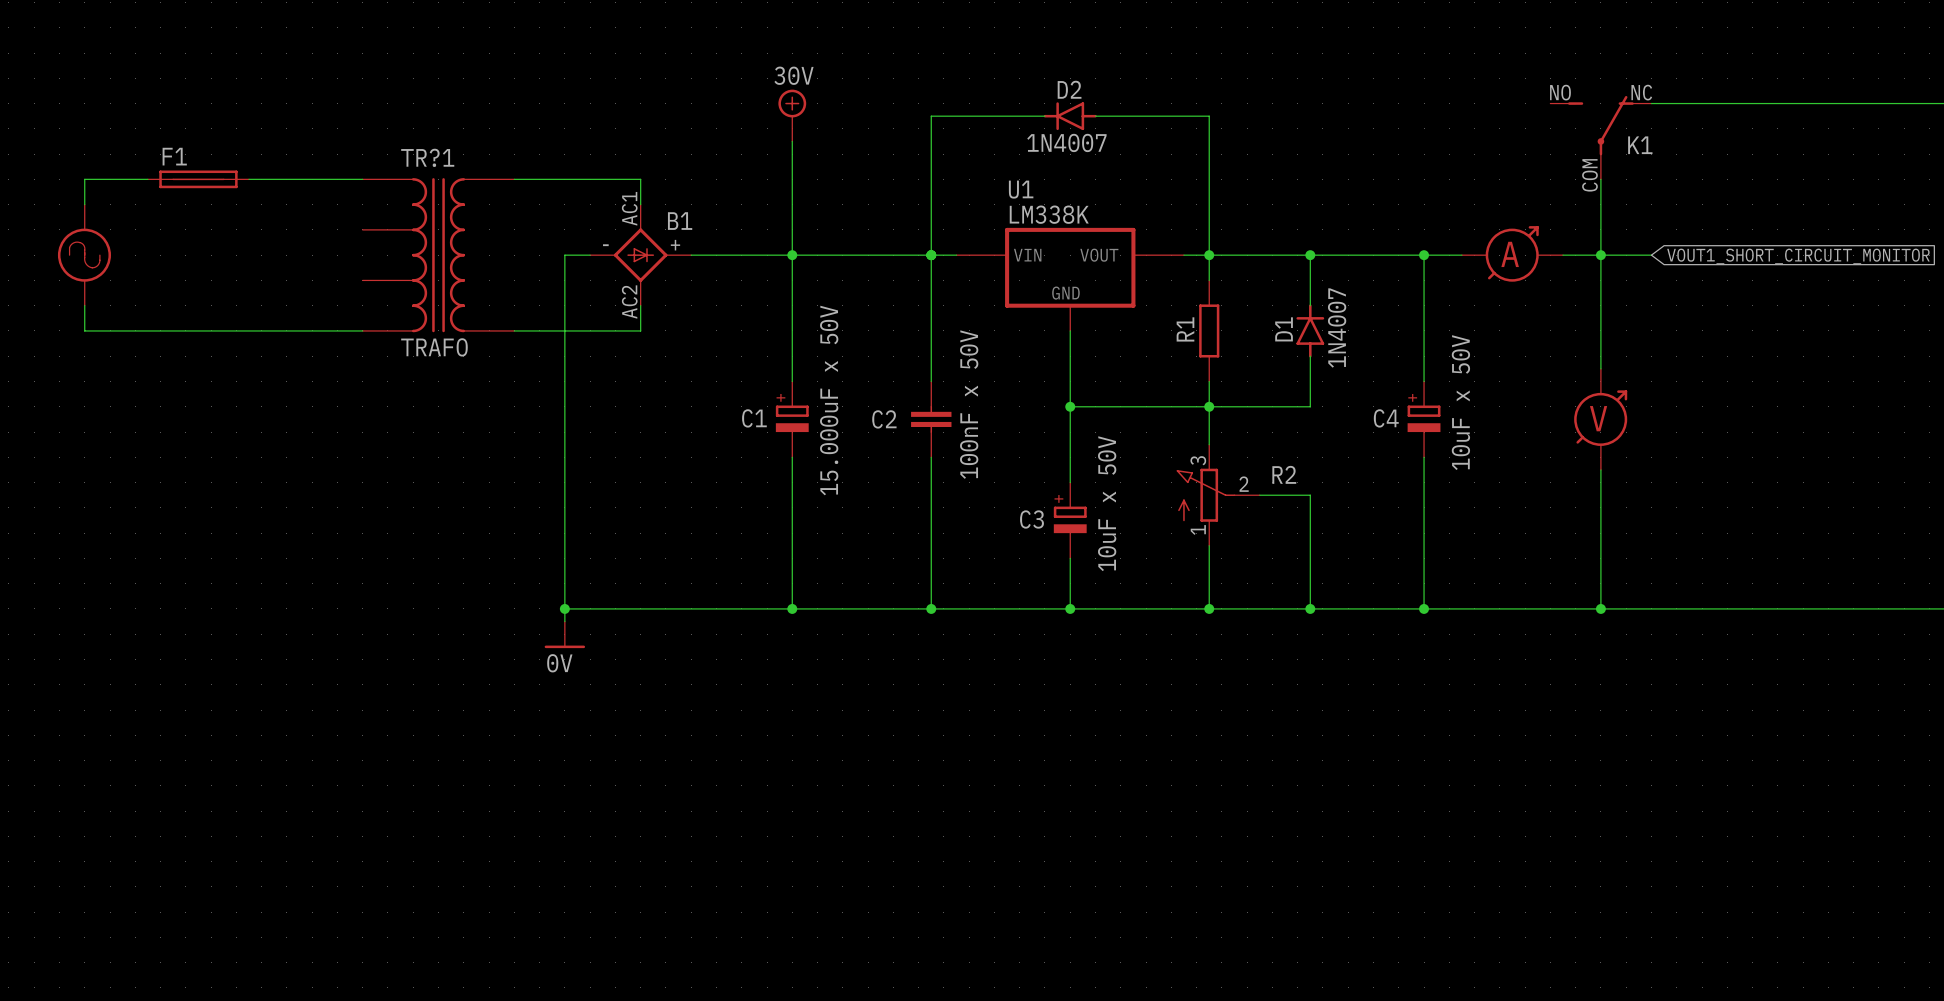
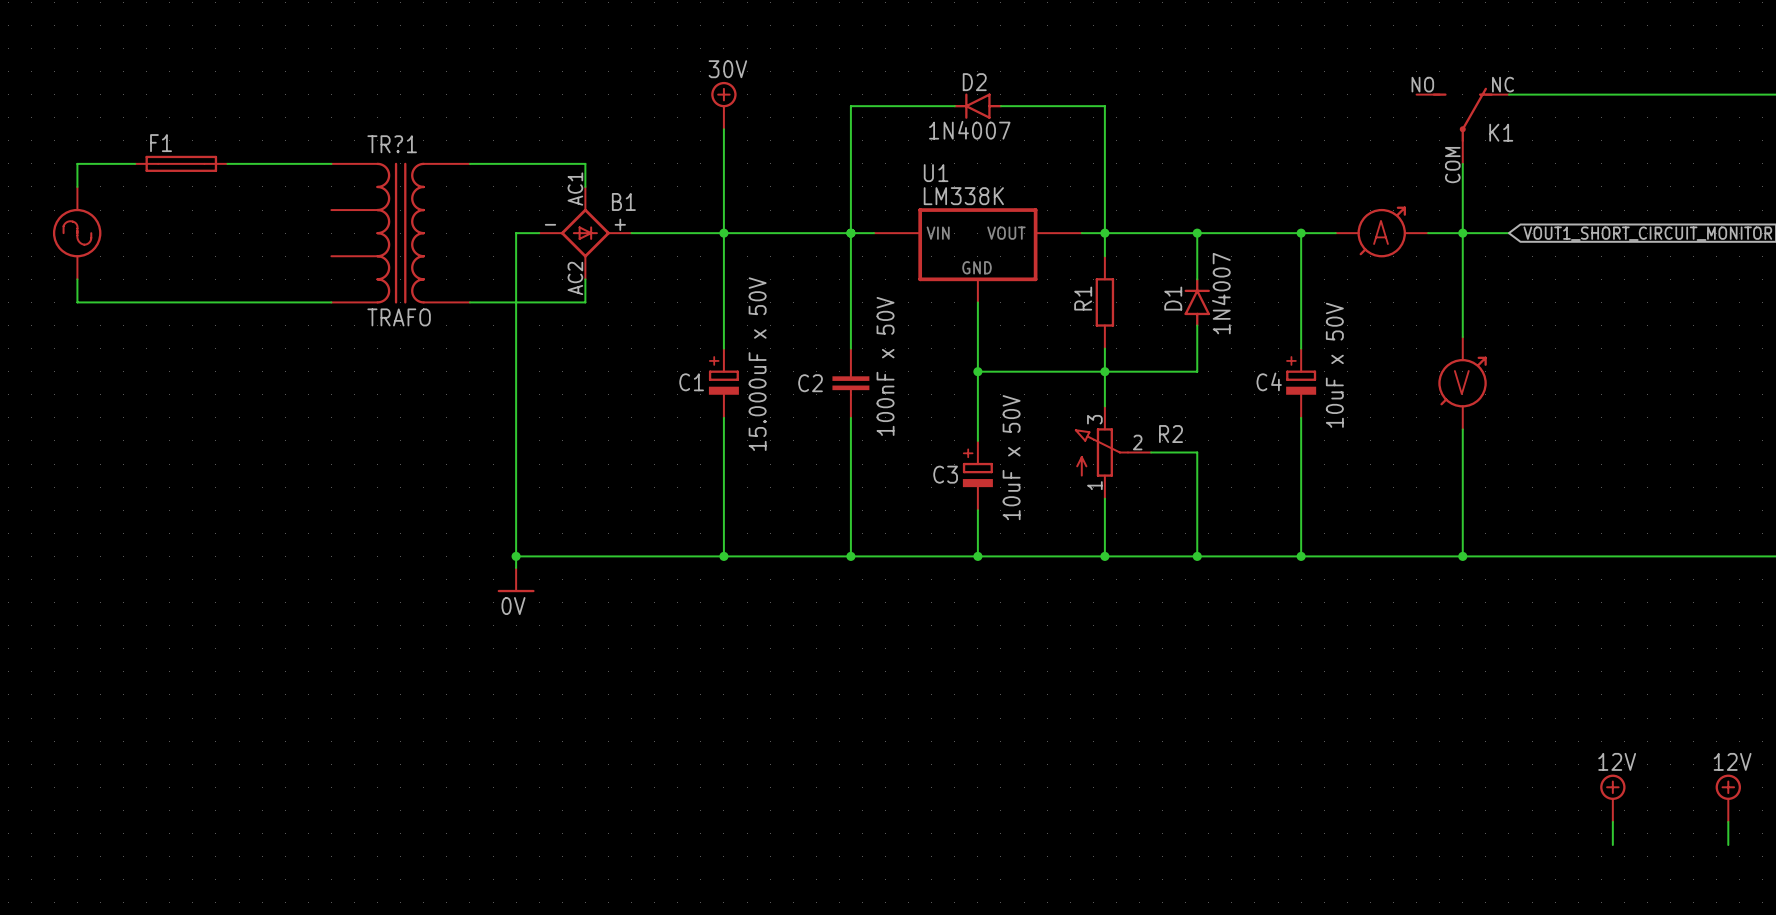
power symbol: none -> 12V (1612, 798)
power symbol: none -> 12V (1728, 798)
wire: none -> (1612, 821) (1612, 845)
wire: none -> (1728, 821) (1728, 845)

